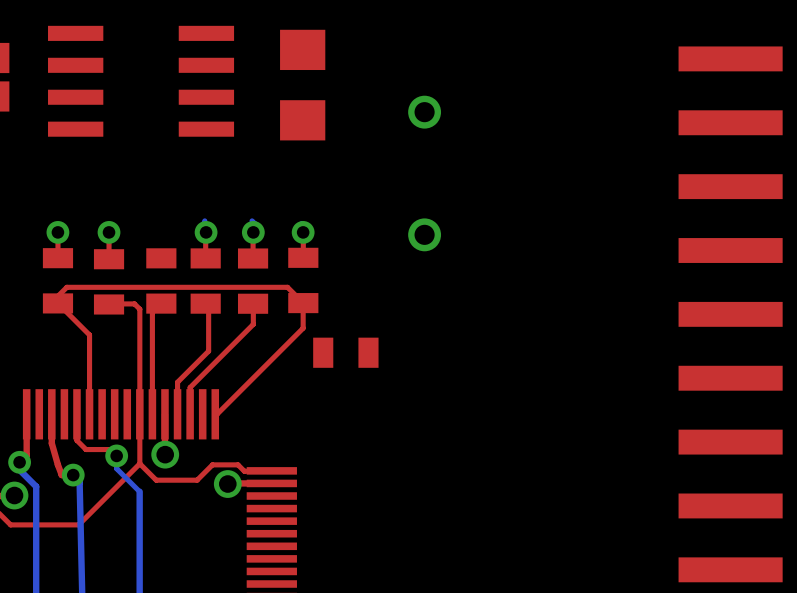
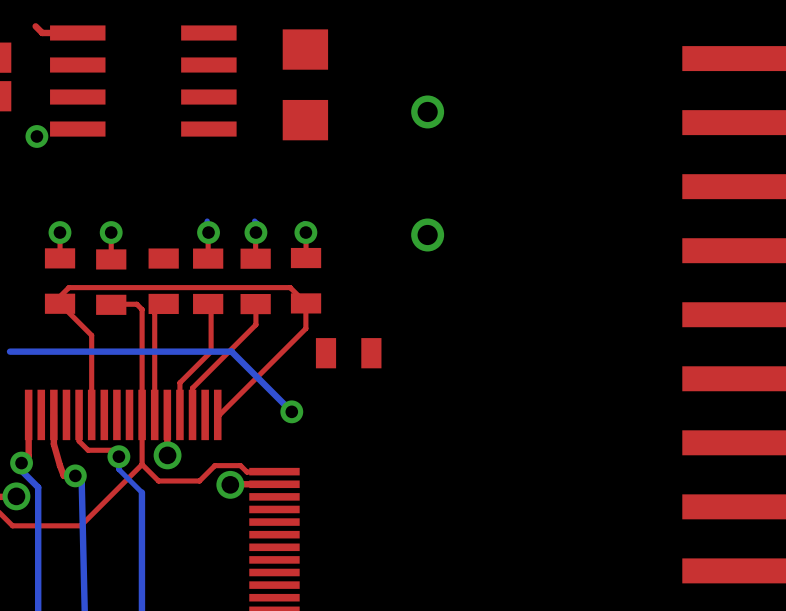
top track: none -> (35, 26) (42, 32) (77, 32)
via: none -> (36, 136)
bottom track: none -> (10, 351) (231, 351) (291, 411)
via: none -> (291, 411)

